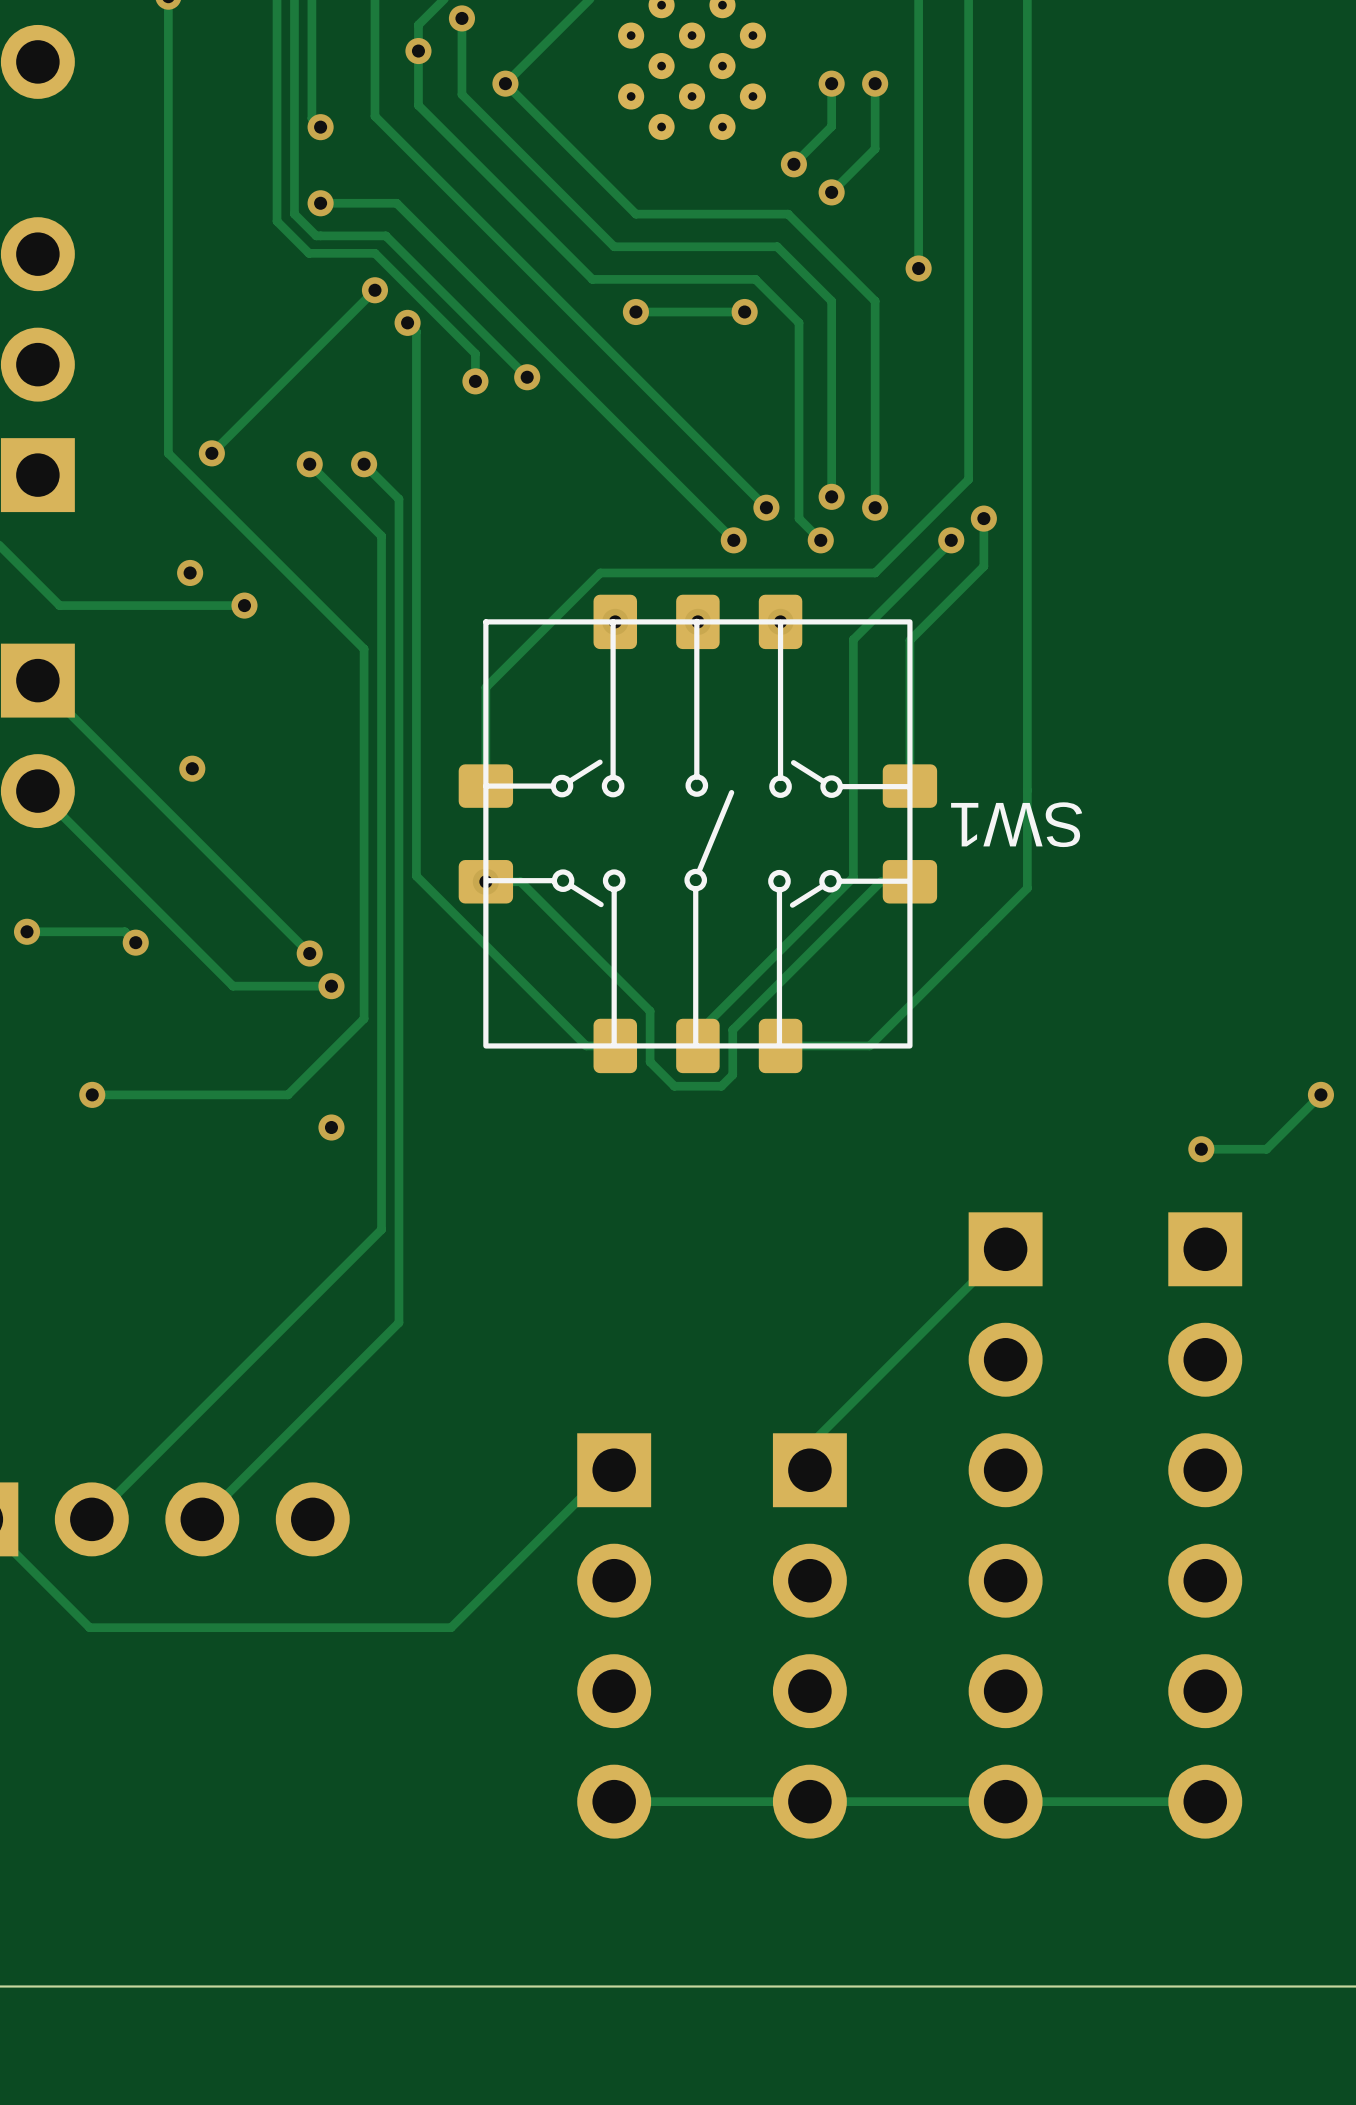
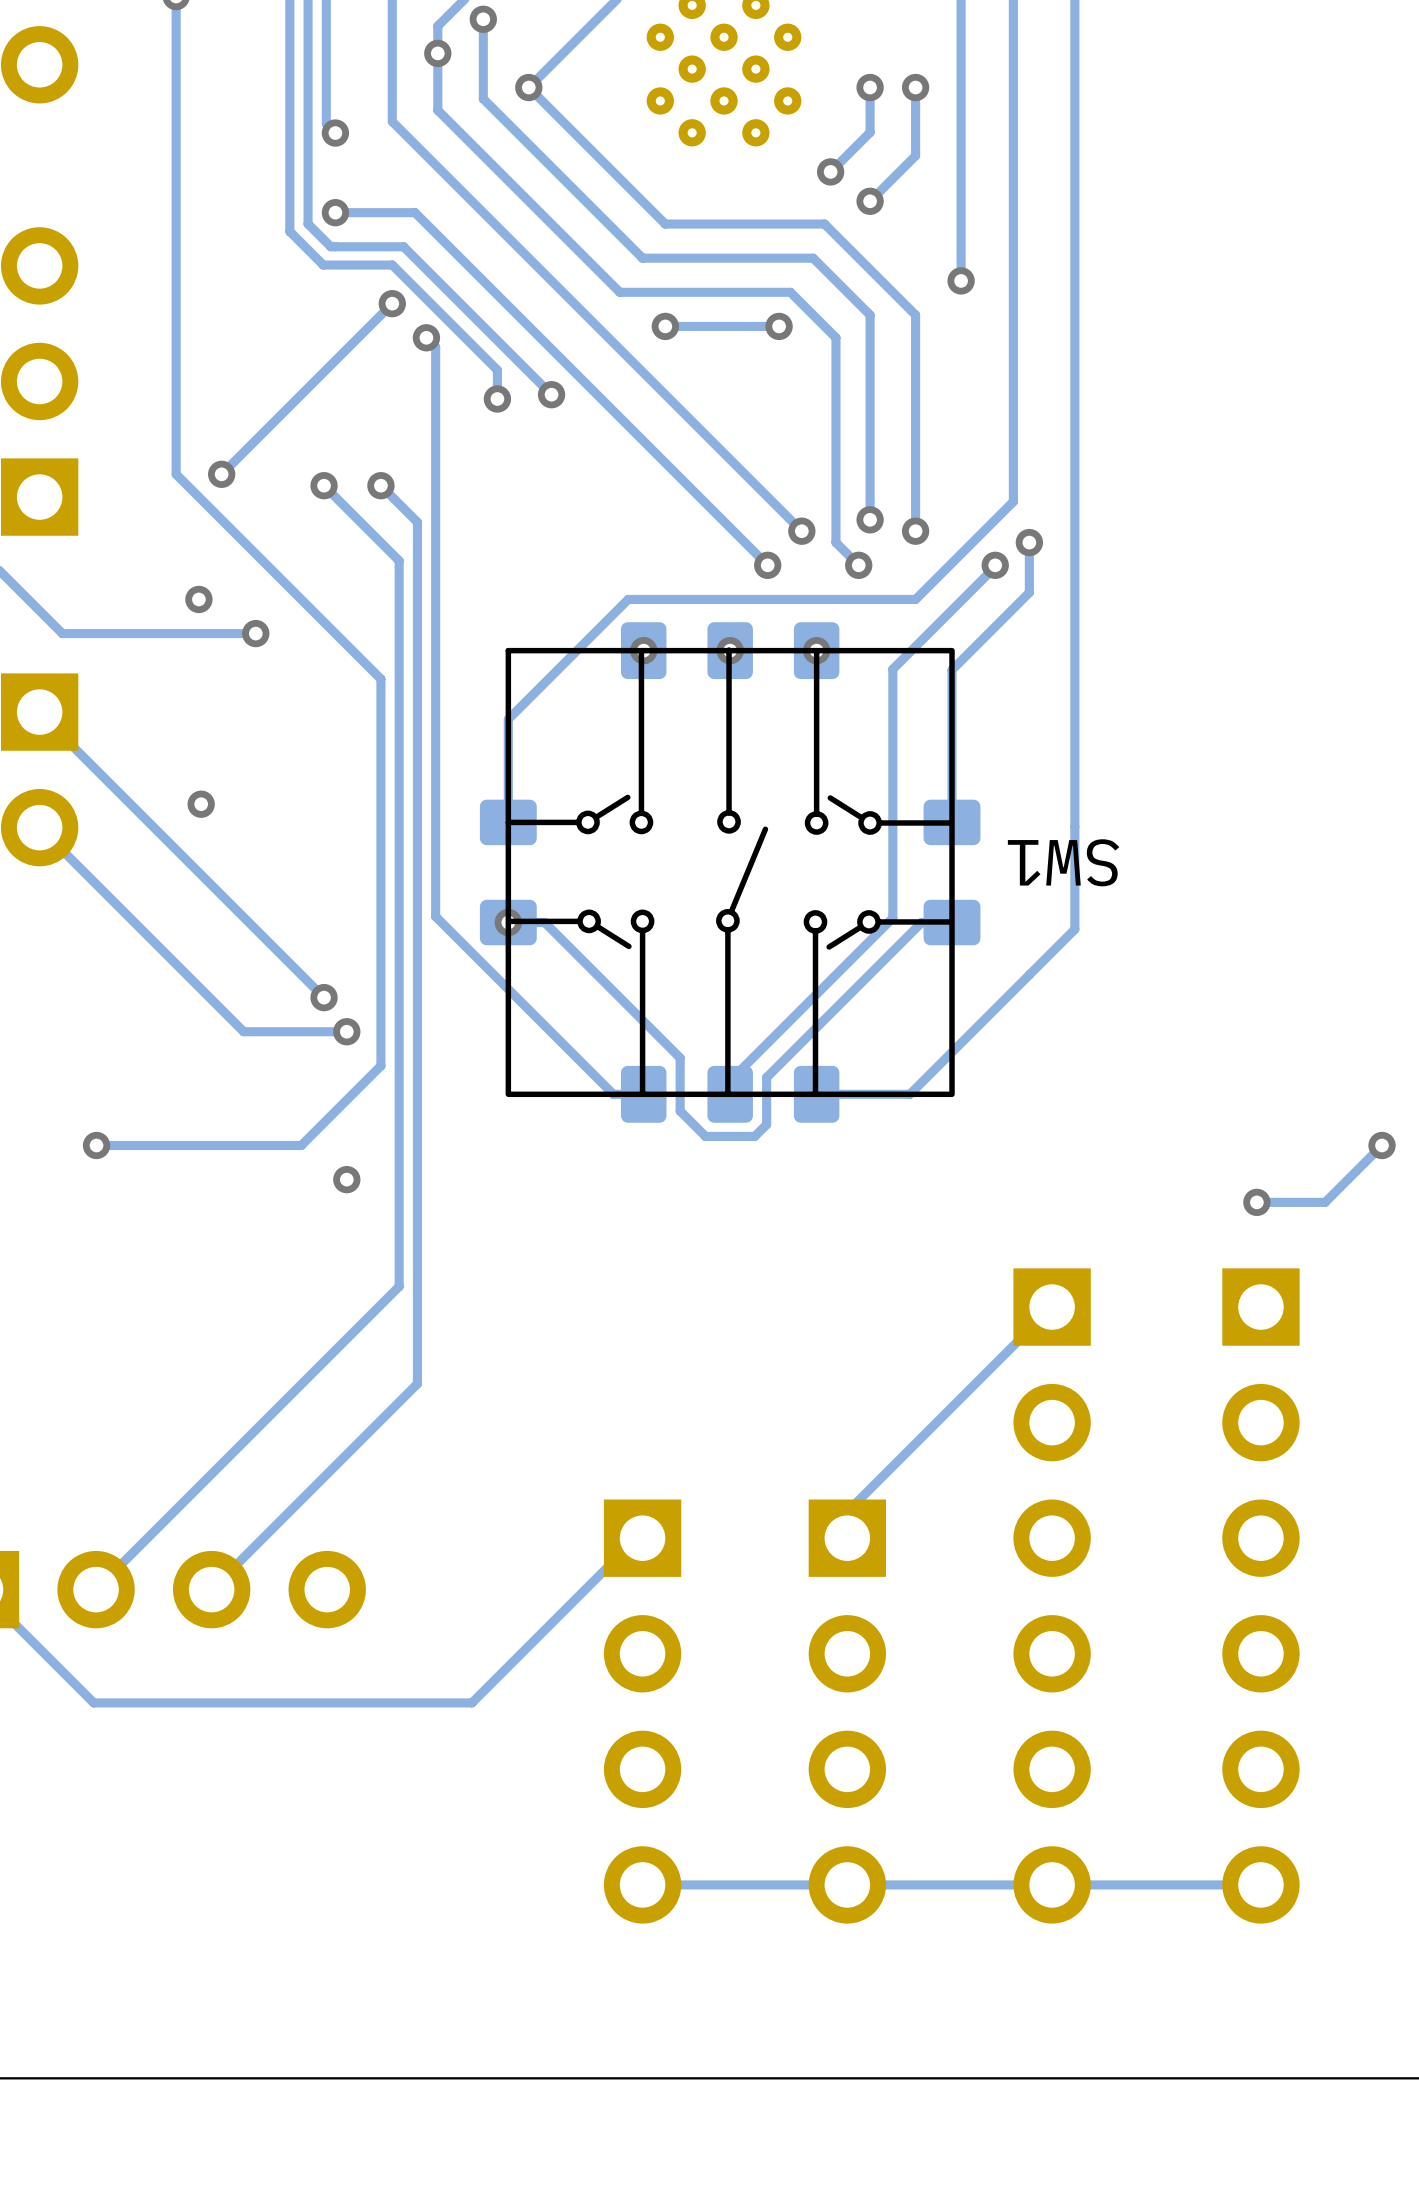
track: (27, 931) (124, 931) (135, 942) -> none
via: (27, 931) -> none
via: (135, 942) -> none

